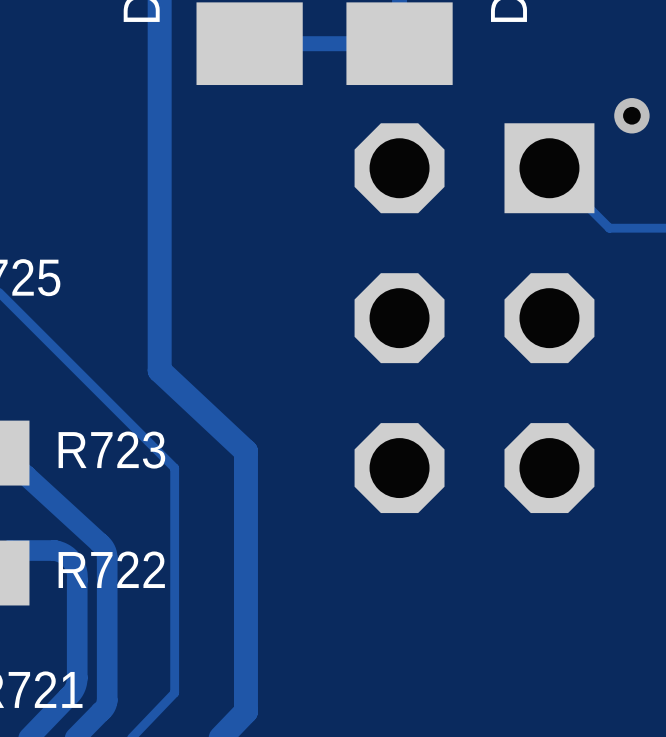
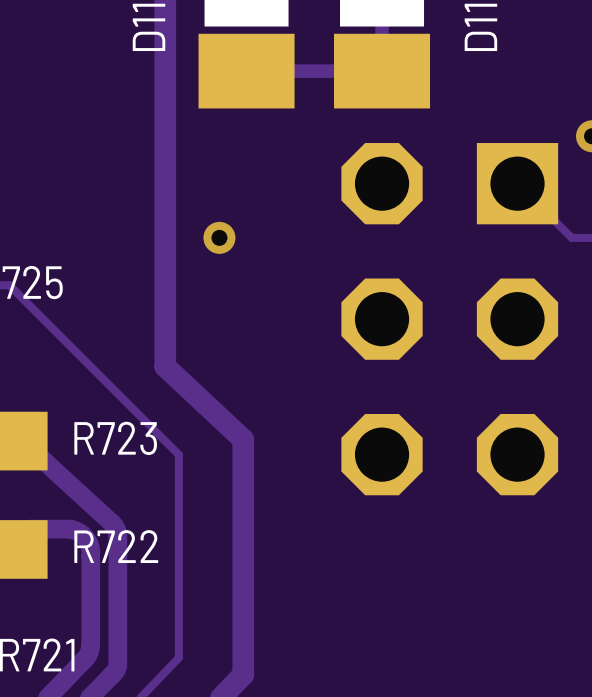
via: none -> (219, 237)

